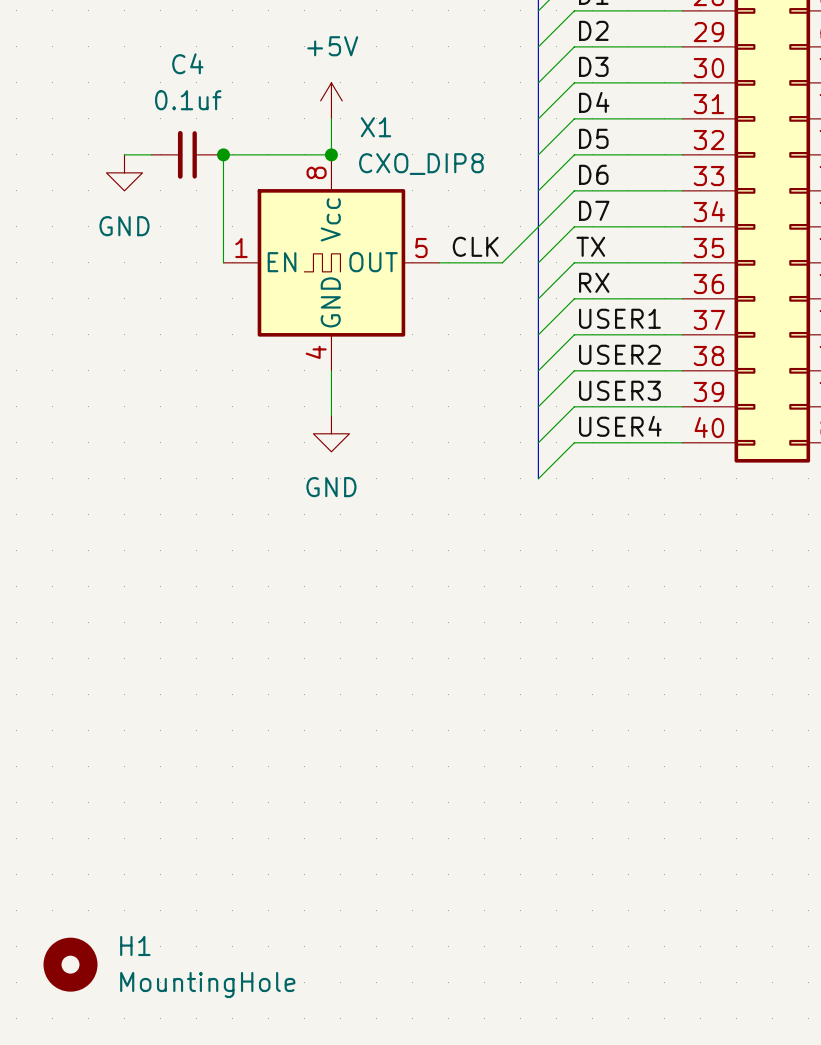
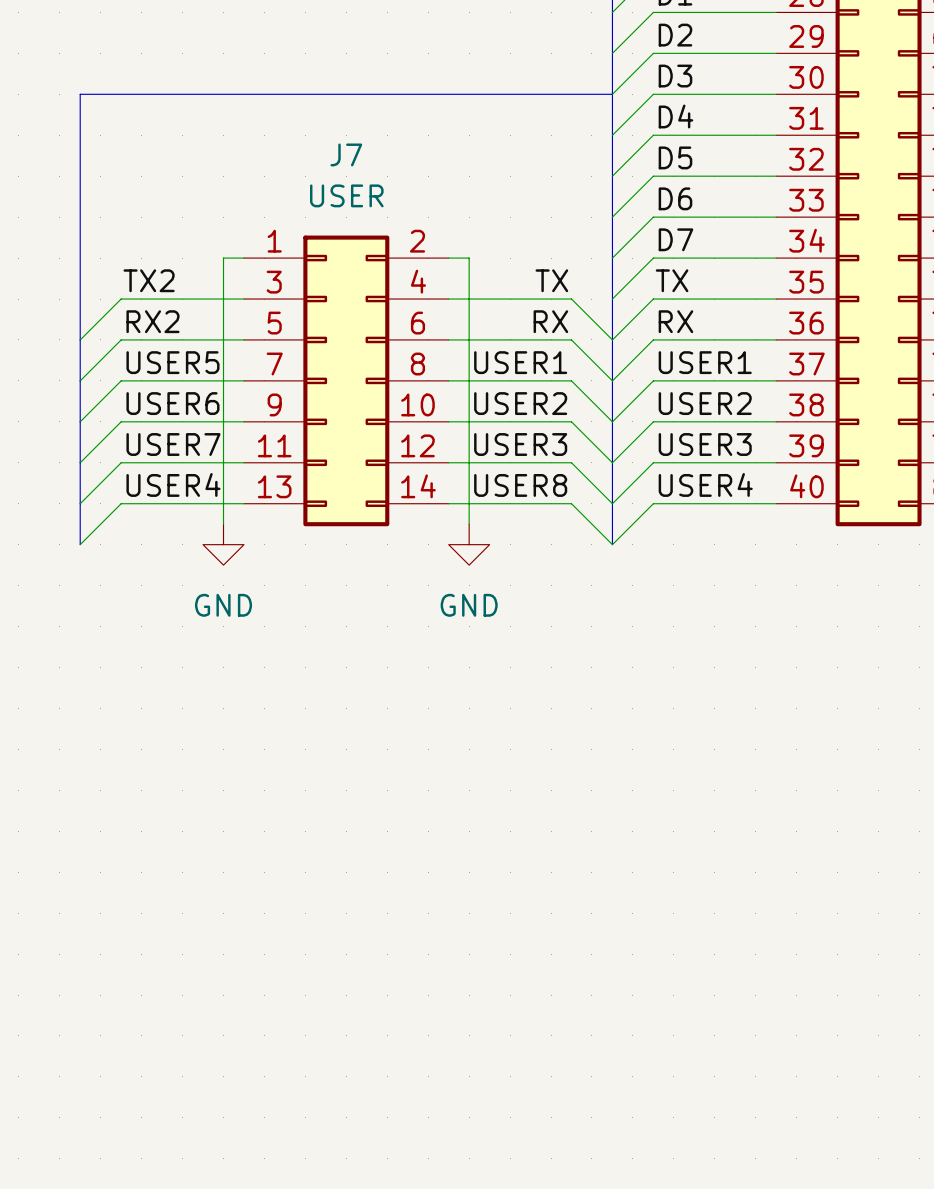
bus: none -> (612, 94) (80, 94) (80, 544)
power symbol: +5V (331, 100) -> none
wire: (331, 118) (331, 154) (223, 154) (223, 262) -> none
wire: (124, 154) (151, 154) -> none
C4: 0.1uf (187, 154) -> none
junction: (223, 154) -> none
junction: (331, 154) -> none
power symbol: GND (124, 172) -> none
wire: none -> (243, 258) (223, 258) (223, 524)
wire: none -> (448, 258) (469, 258) (469, 524)
wire: (538, 226) (502, 262) -> (612, 339) (571, 299)
label: none -> TX2 (149, 280)
label: CLK (475, 246) -> TX (551, 280)
wire: none -> (243, 299) (121, 299) (80, 339)
X1: CXO_DIP8 (331, 262) -> none
label: none -> RX2 (152, 321)
label: none -> RX (550, 321)
wire: none -> (243, 339) (121, 339) (80, 380)
wire: none -> (448, 339) (571, 339) (612, 380)
label: none -> USER5 (172, 362)
label: none -> USER1 (520, 362)
wire: none -> (243, 380) (121, 380) (80, 421)
J7: none -> USER (346, 380)
wire: none -> (448, 380) (571, 380) (612, 421)
label: none -> USER6 (172, 403)
label: none -> USER2 (520, 403)
wire: none -> (243, 421) (121, 421) (80, 462)
wire: none -> (448, 421) (571, 421) (612, 462)
label: none -> USER7 (173, 444)
label: none -> USER3 (520, 444)
wire: none -> (243, 462) (121, 462) (80, 503)
wire: none -> (448, 462) (571, 462) (612, 503)
label: none -> USER4 (173, 484)
label: none -> USER8 (520, 485)
power symbol: GND (331, 433) -> none
wire: none -> (243, 503) (121, 503) (80, 544)
wire: none -> (448, 503) (571, 503) (612, 544)
power symbol: none -> GND (223, 544)
power symbol: none -> GND (469, 544)
H1: MountingHole (70, 964) -> none

